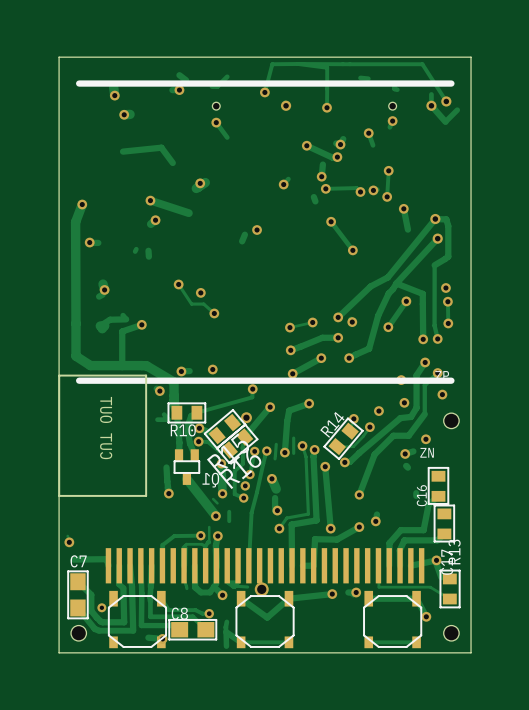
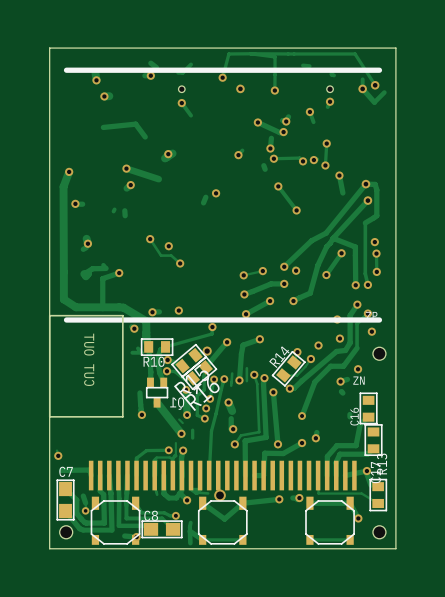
track: none -> (83, 496) (86, 510)

